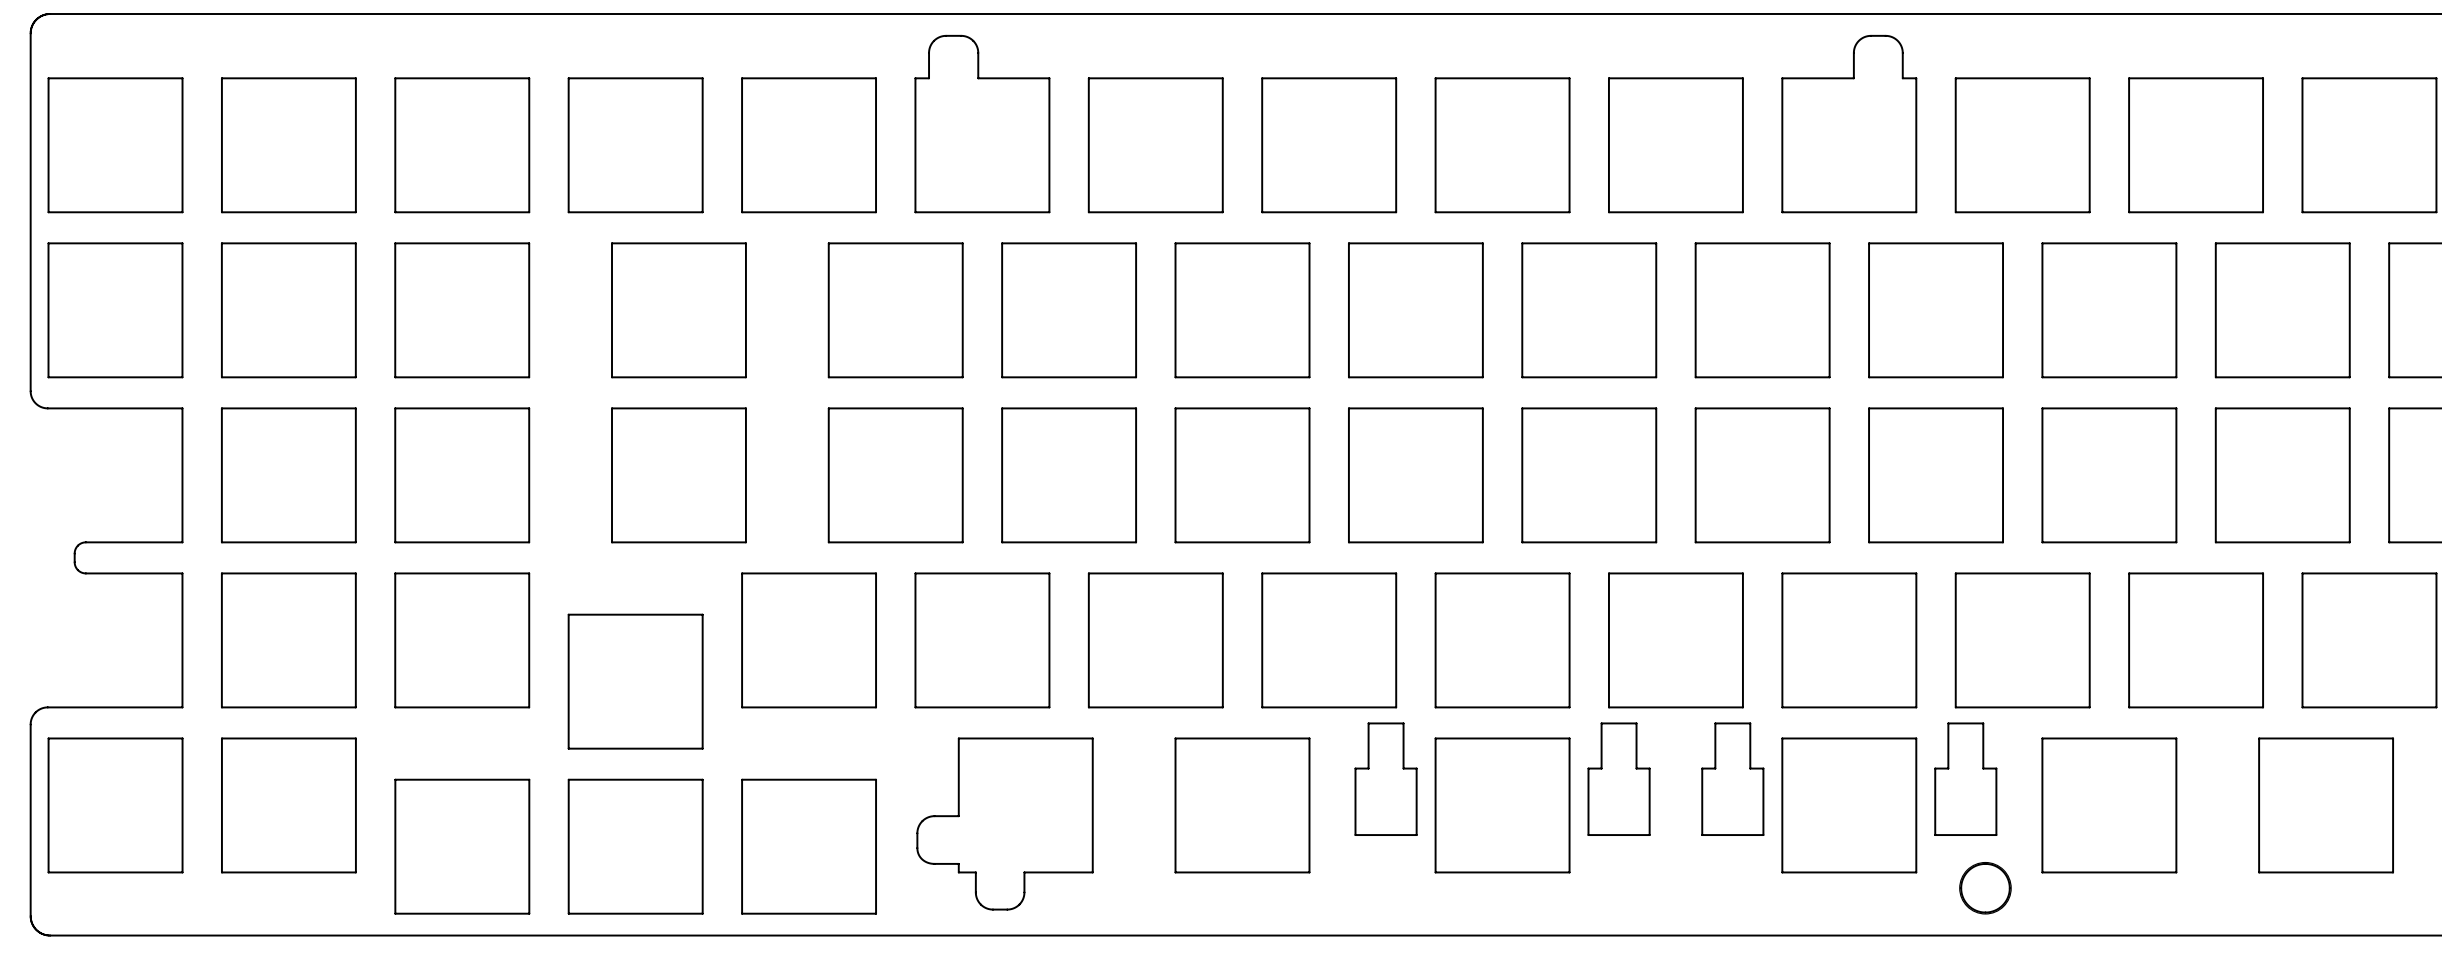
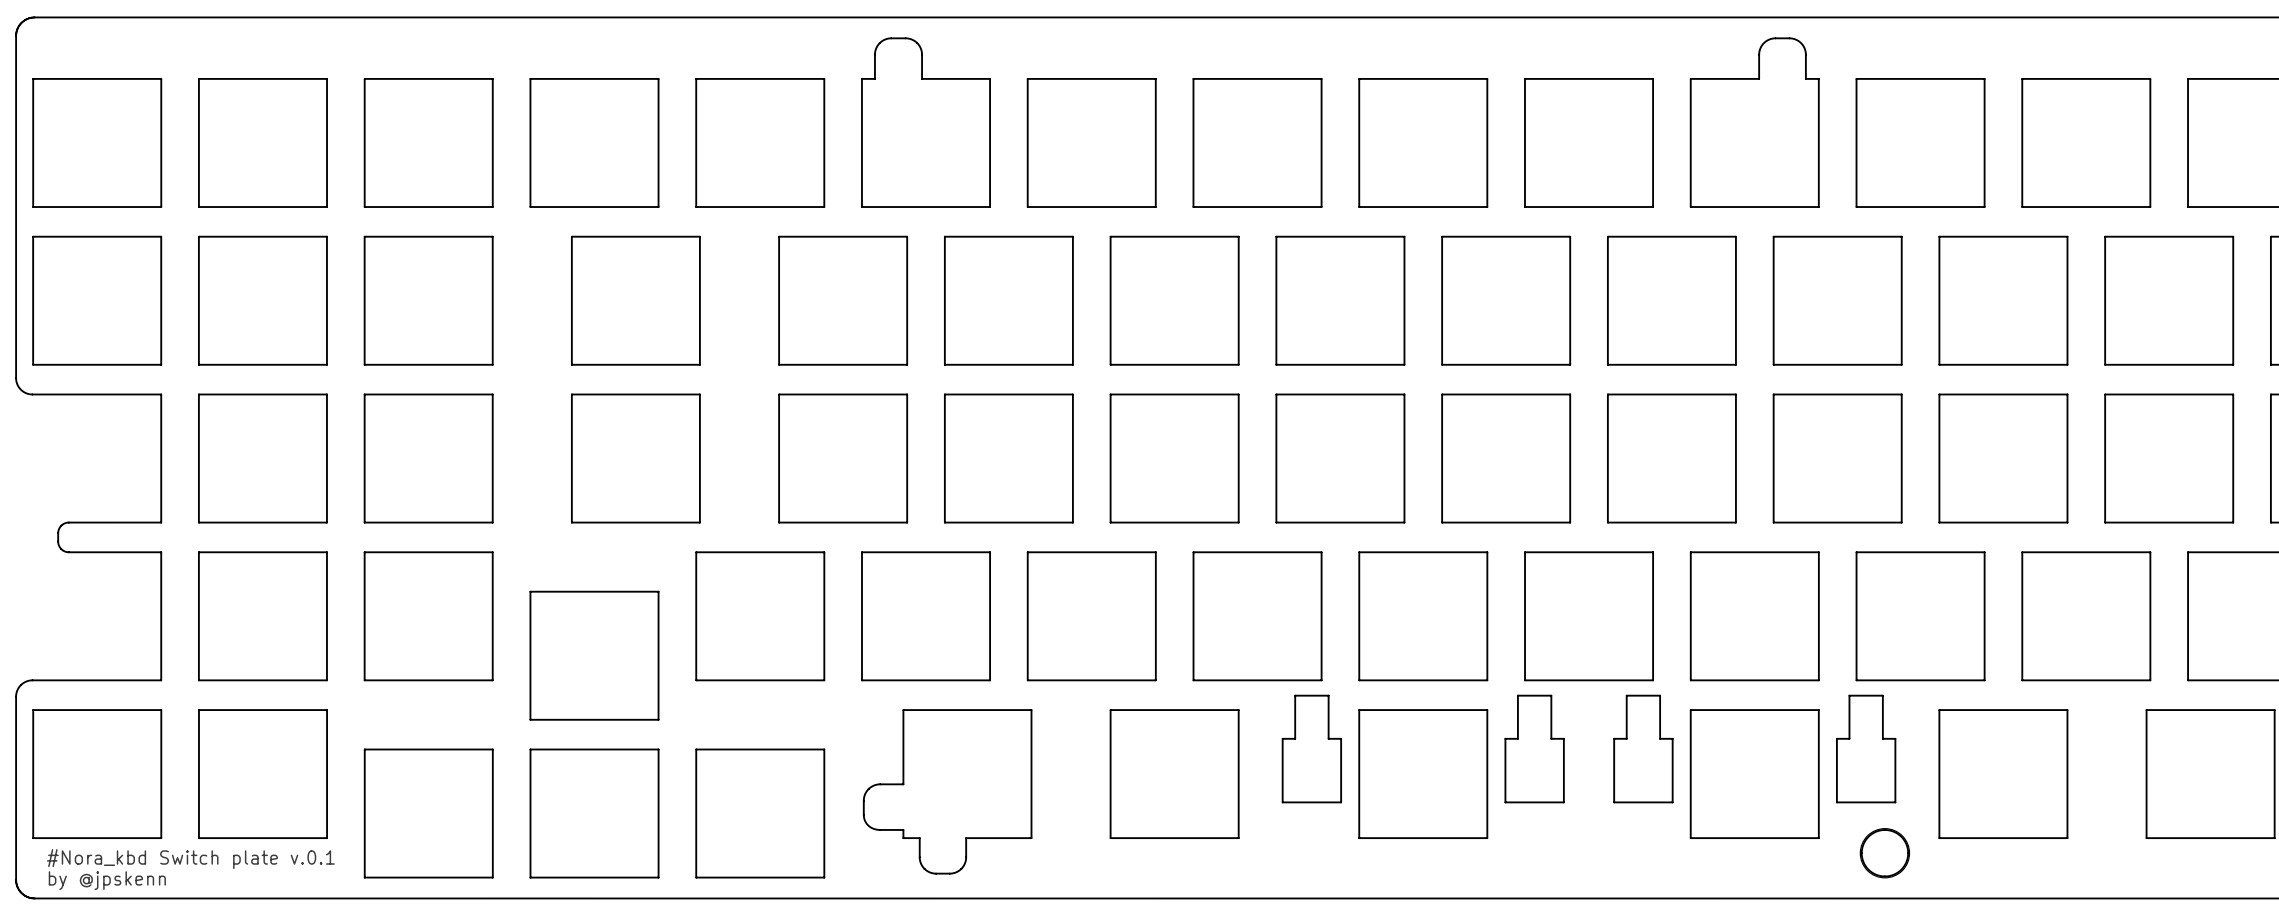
text: none -> #Nora_kbd Switch plate v.0.1 (190, 859)
text: none -> by @jpskenn (107, 880)

